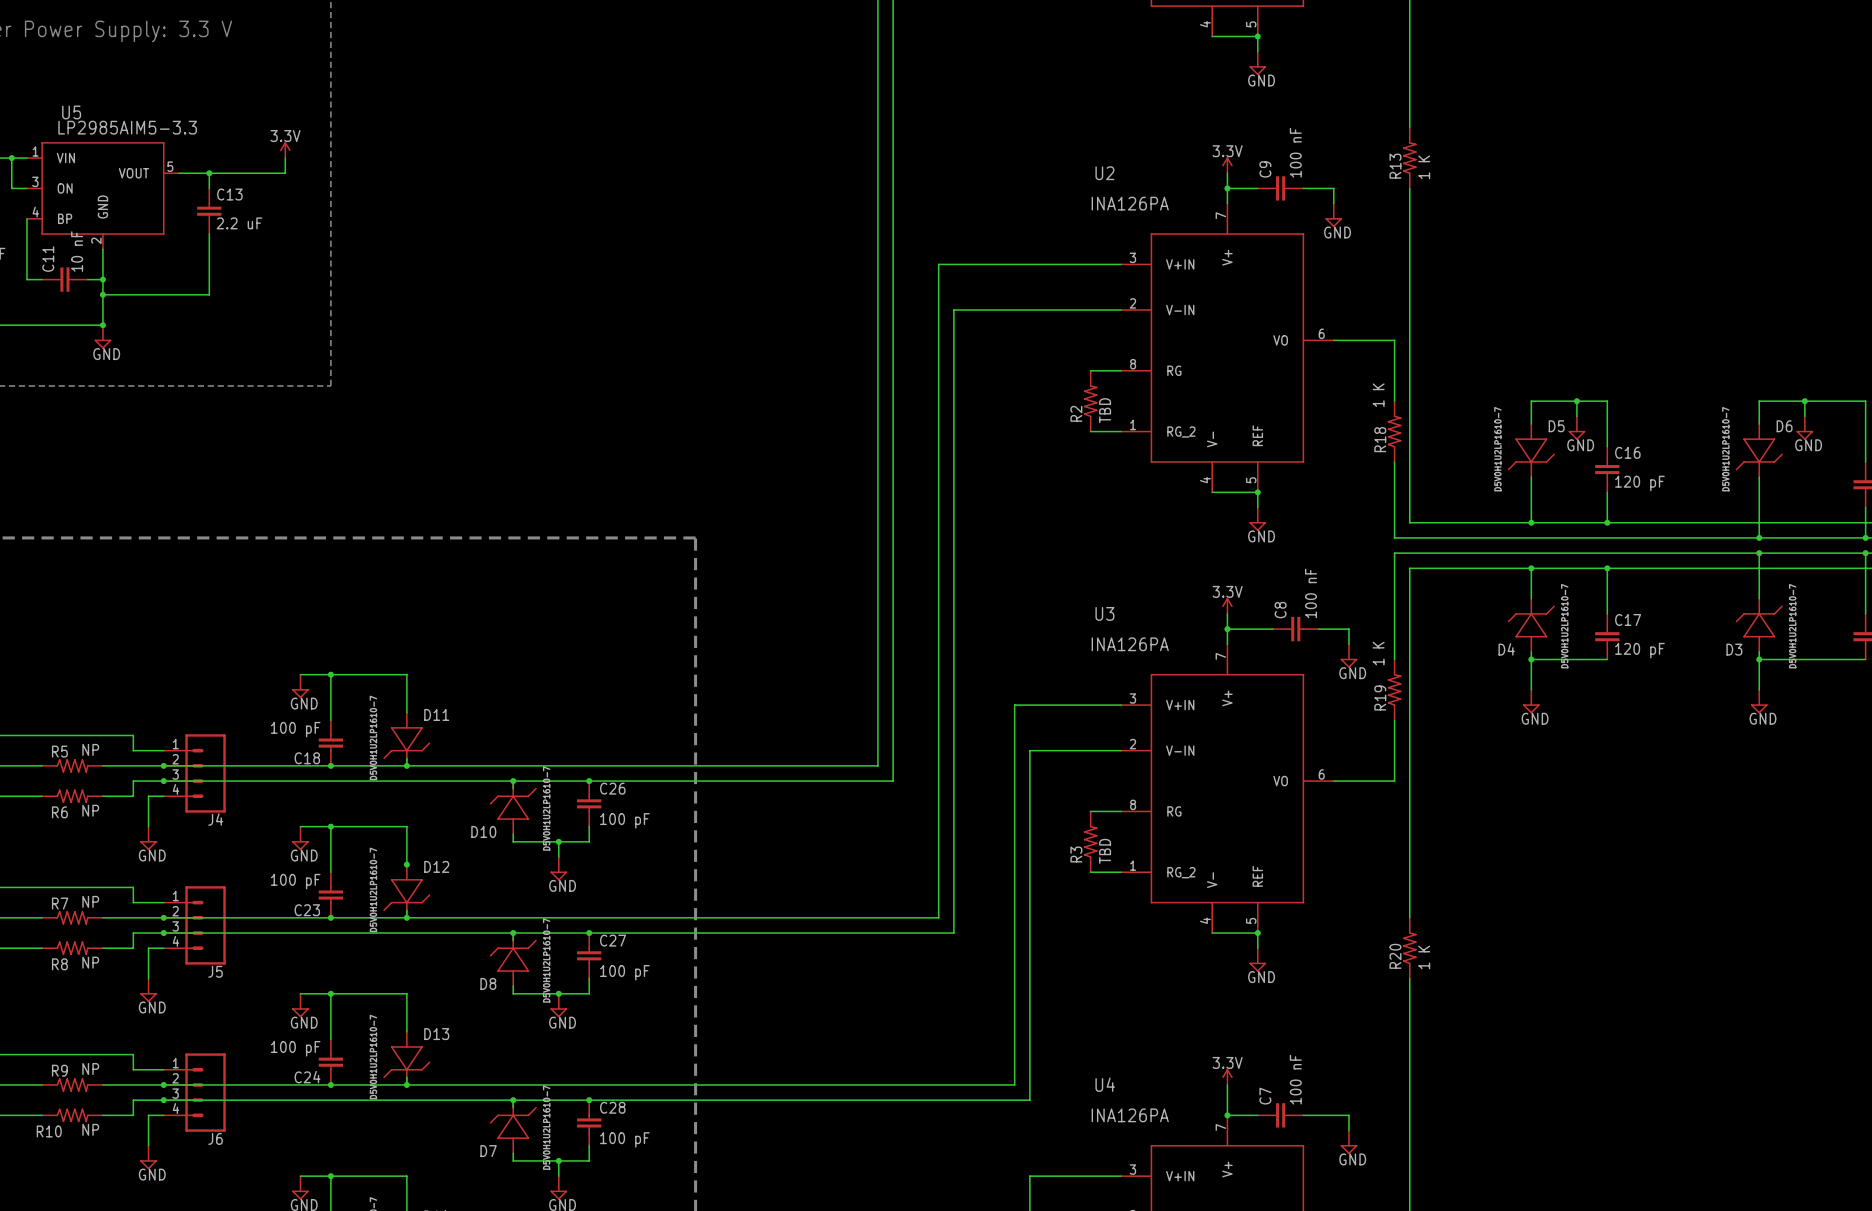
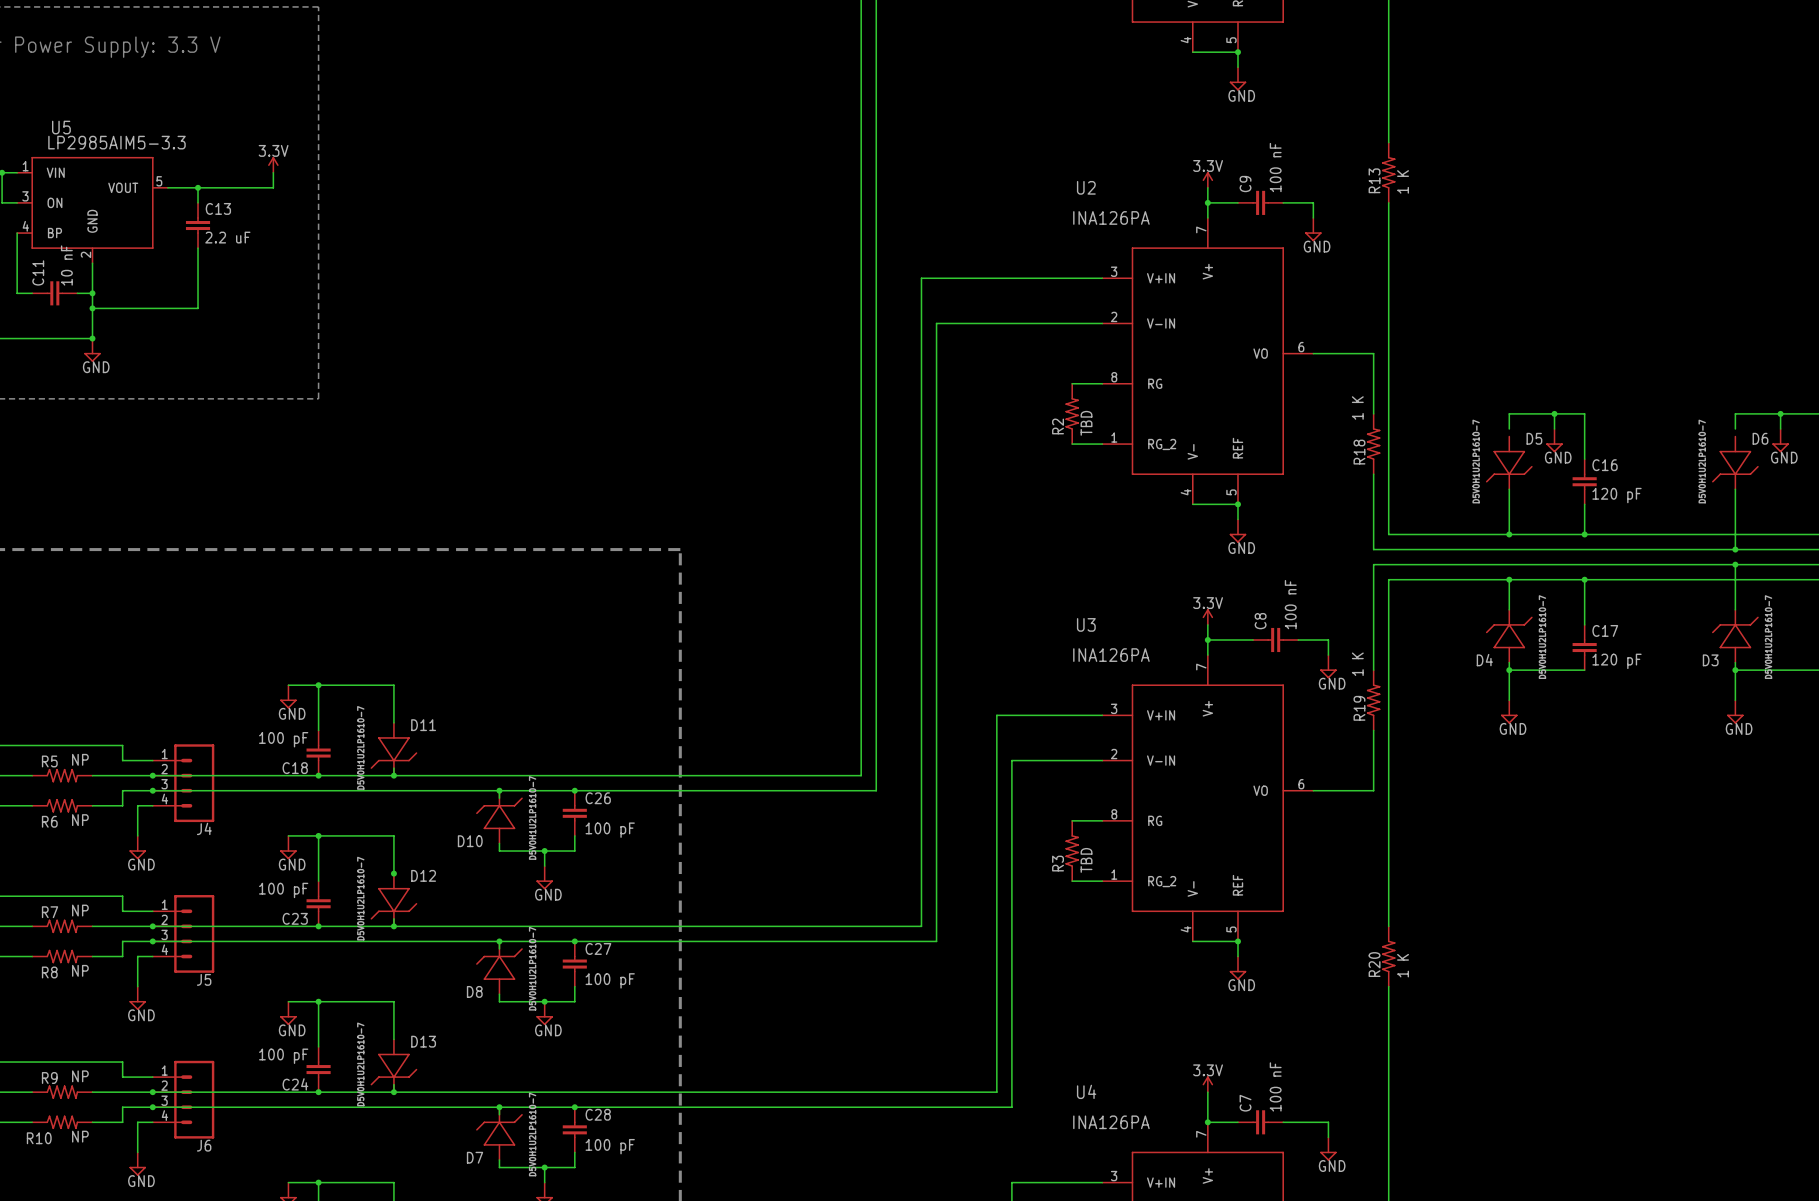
wire: (1531, 416) (1531, 423) -> none
wire: (1759, 416) (1759, 423) -> none

